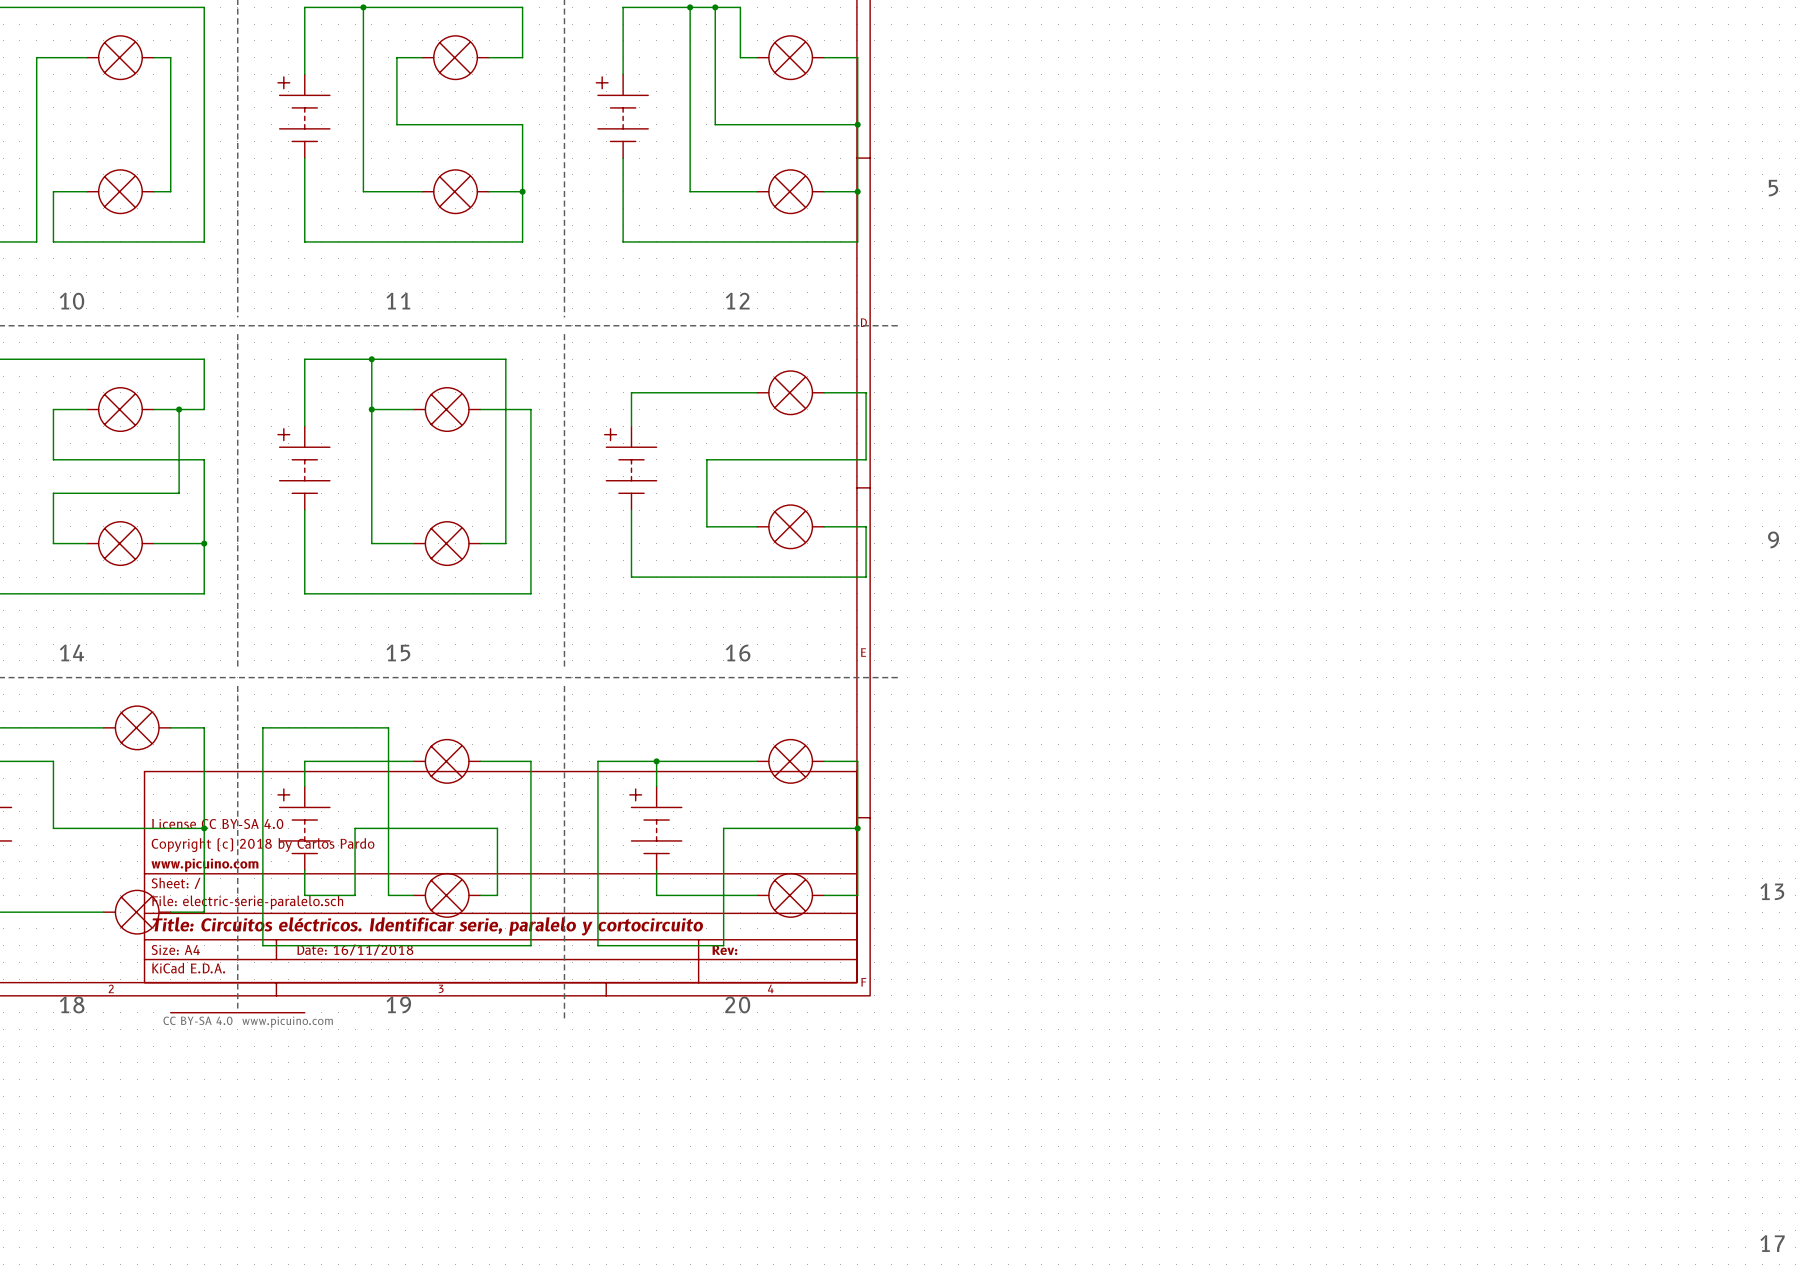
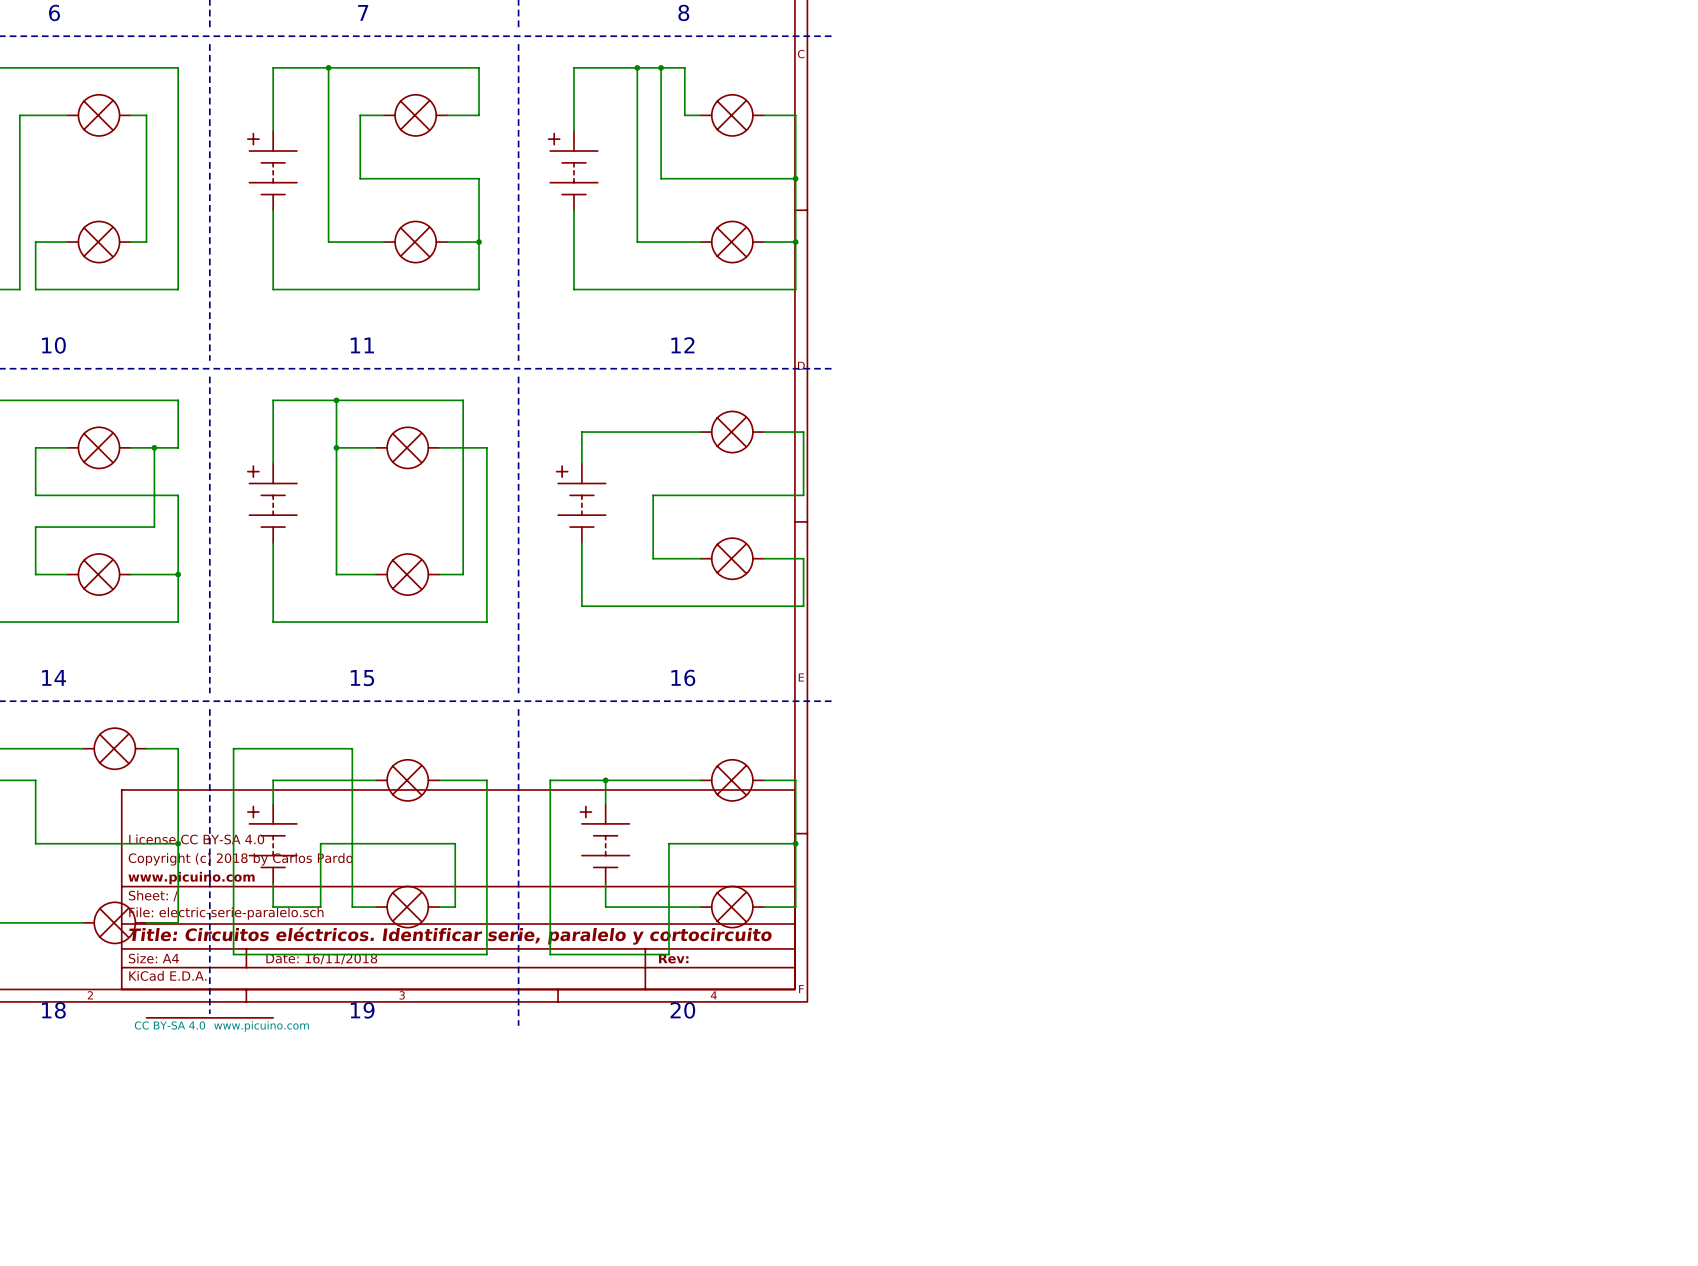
text: 5 (1773, 188) -> none
text: 9 (1773, 539) -> none
text: 13 (1772, 891) -> none
text: 17 (1772, 1243) -> none

